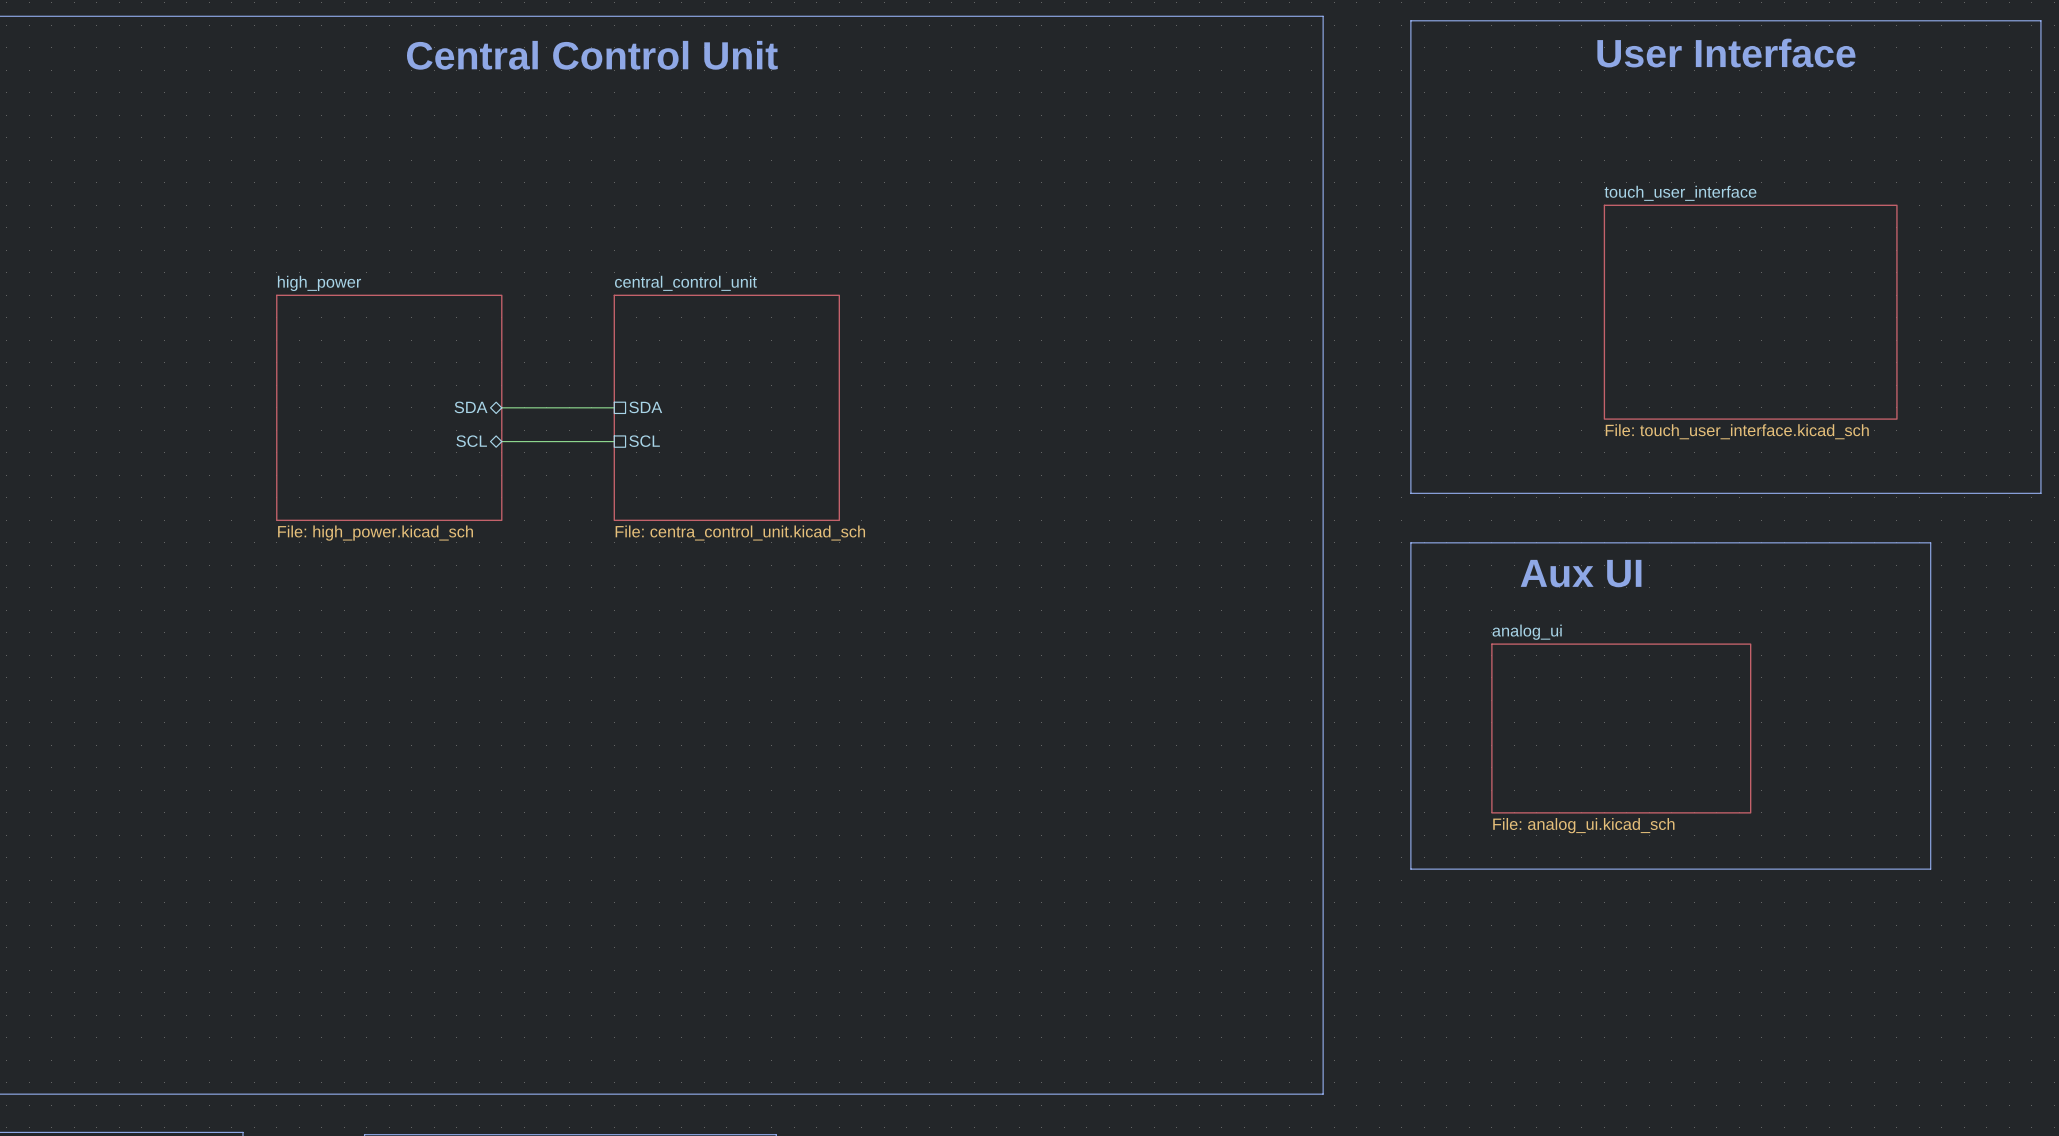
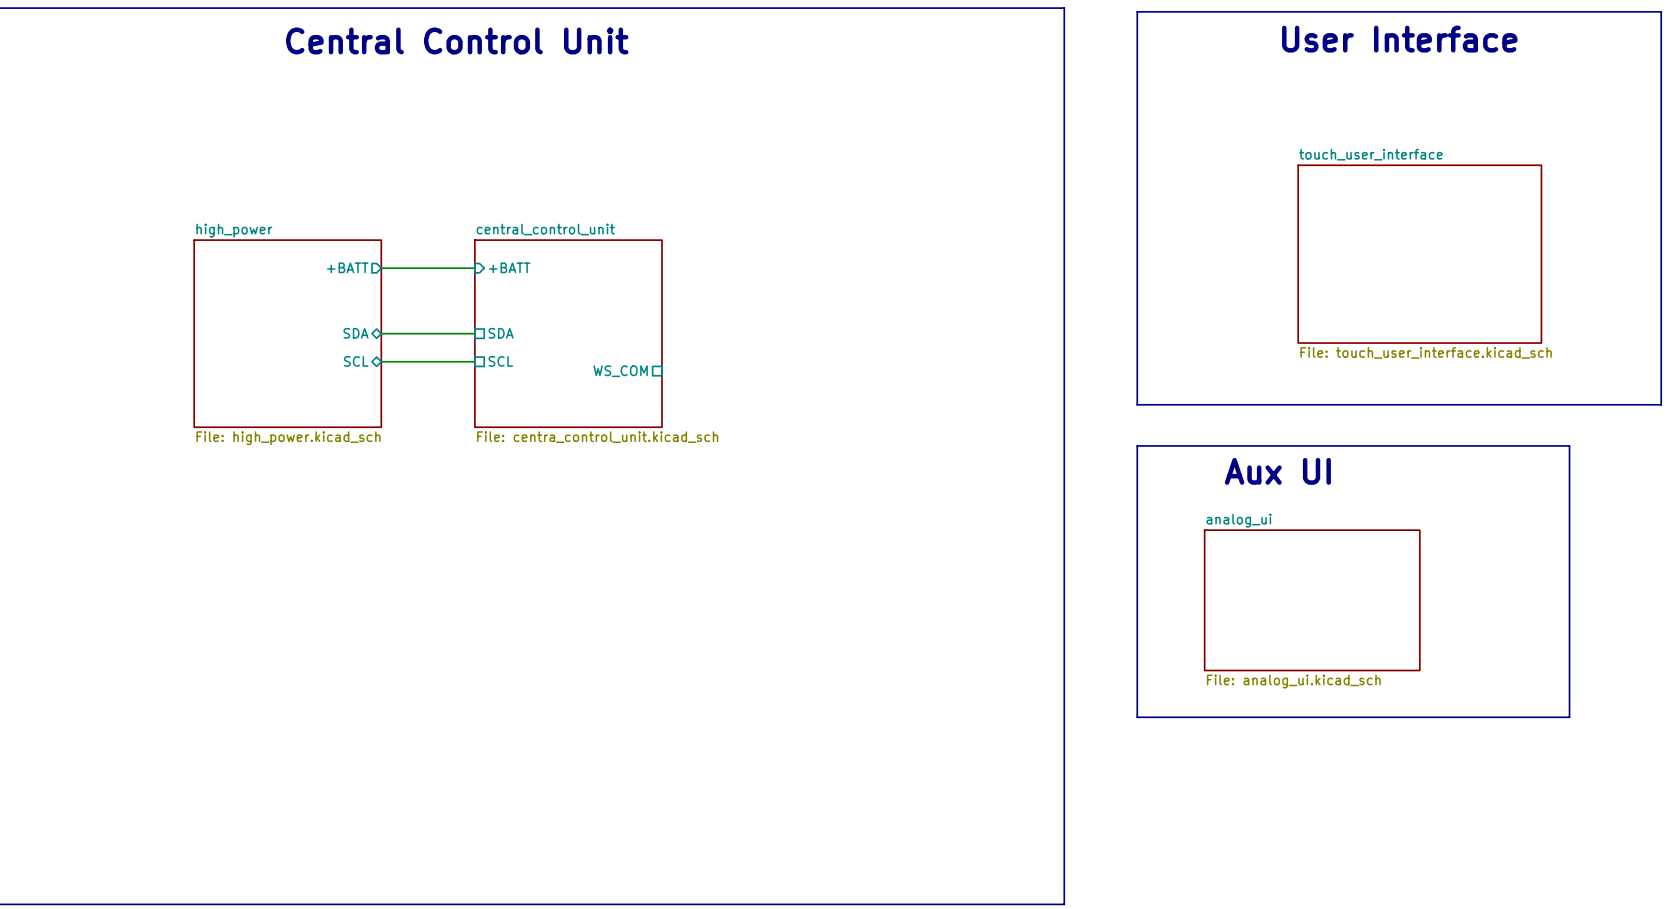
sheet pin: none -> +BATT (347, 267)
sheet pin: none -> +BATT (509, 267)
wire: none -> (381, 268) (474, 268)
sheet pin: none -> WS_COM (620, 371)

